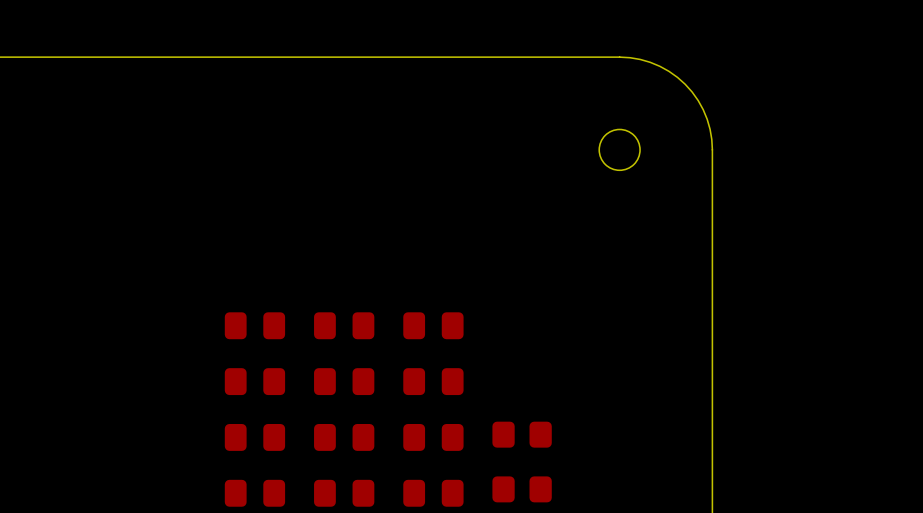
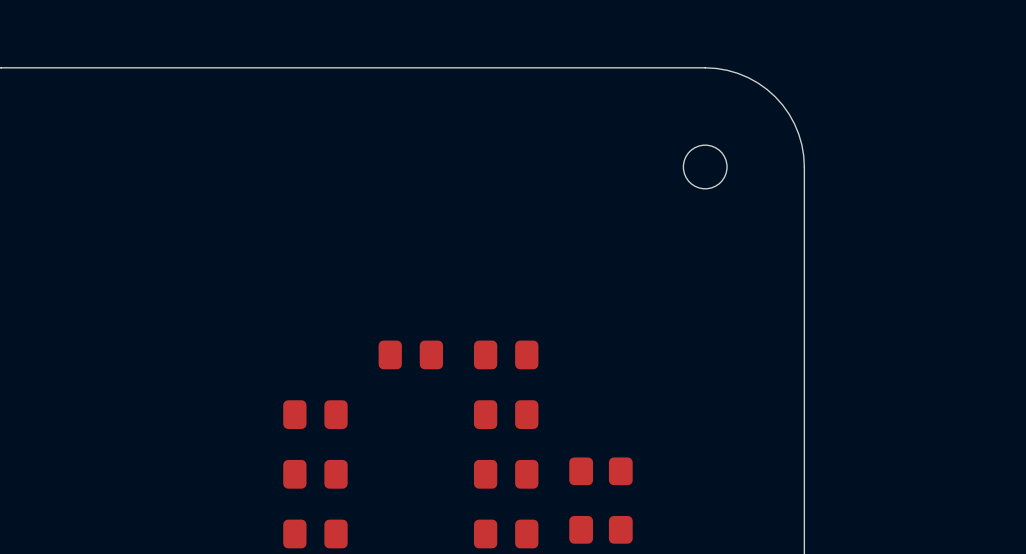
part: (254, 325) -> none
part: (344, 381) -> none
part: (344, 437) -> none
part: (344, 493) -> none

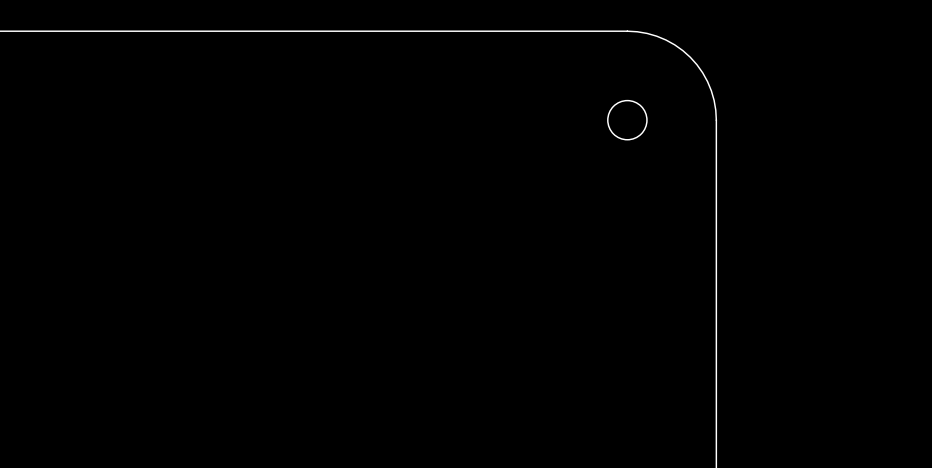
part: (410, 354) -> none
part: (506, 354) -> none
part: (315, 414) -> none
part: (506, 414) -> none
part: (600, 471) -> none
part: (315, 474) -> none
part: (506, 474) -> none
part: (600, 529) -> none
part: (315, 533) -> none
part: (506, 533) -> none

